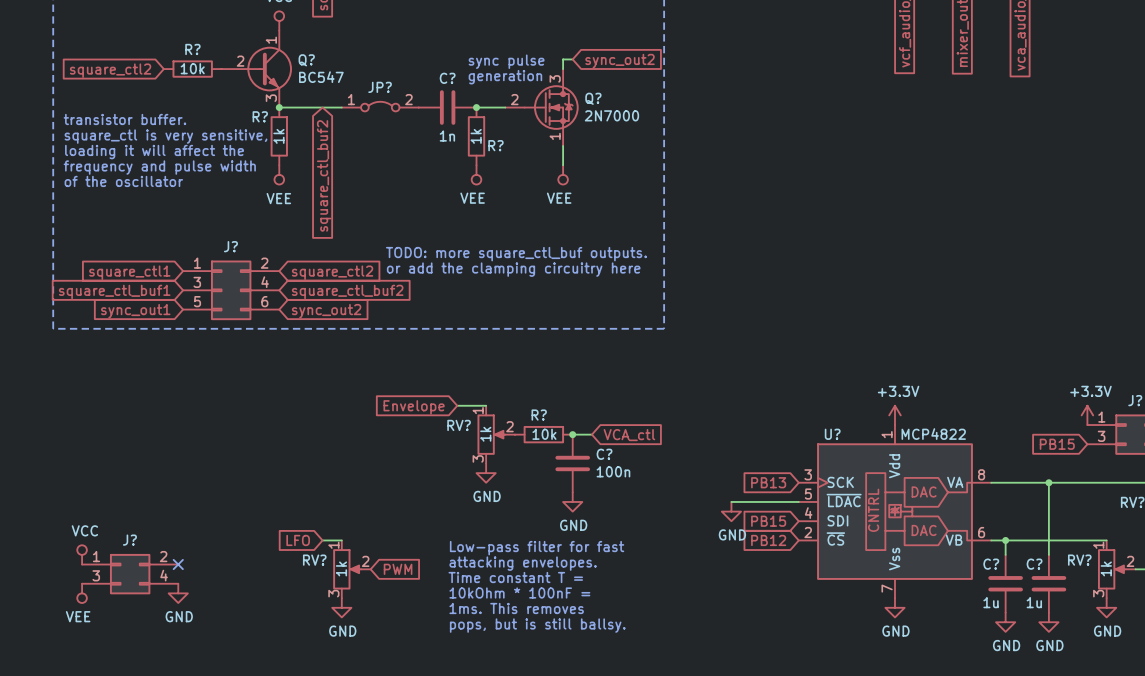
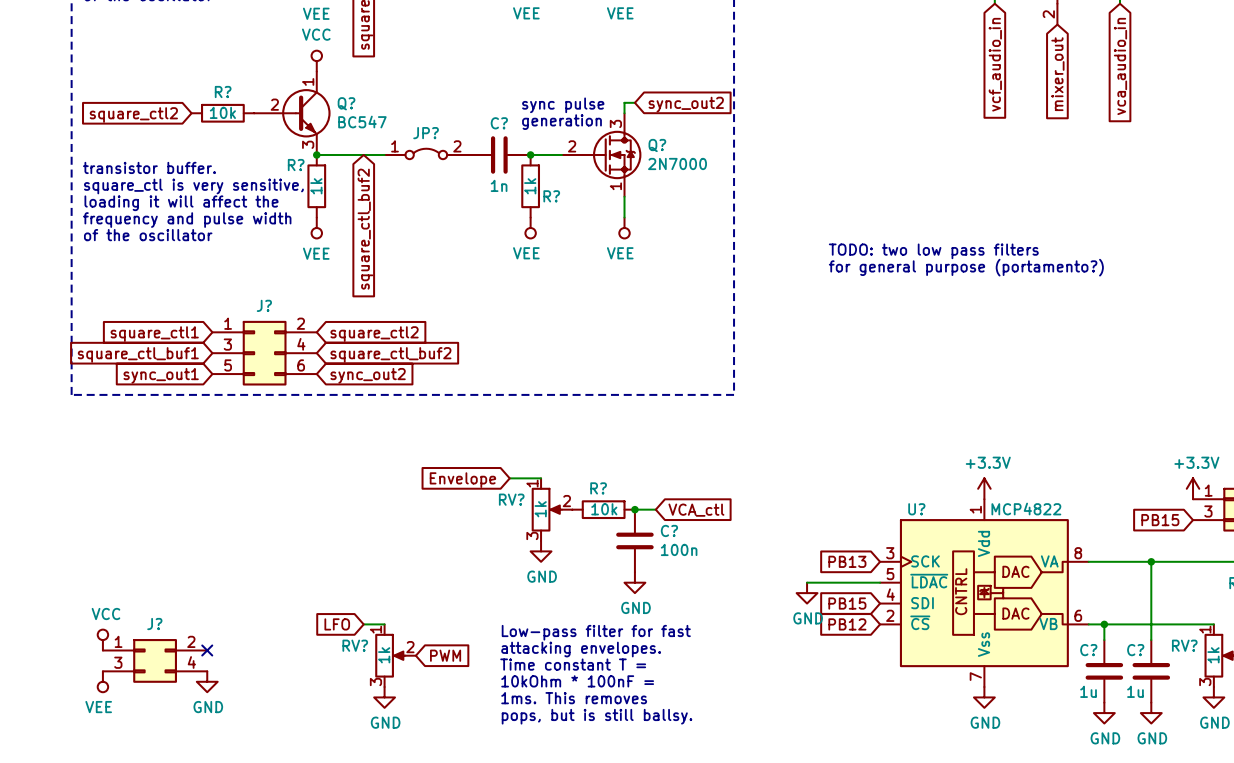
text: none -> TODO: two low pass filters (933, 251)
text: none -> for general purpose (portamento?) (966, 267)
text: TODO: more square_ctl_buf outputs. (516, 254) -> none
text: or add the clamping circuitry here (513, 269) -> none

